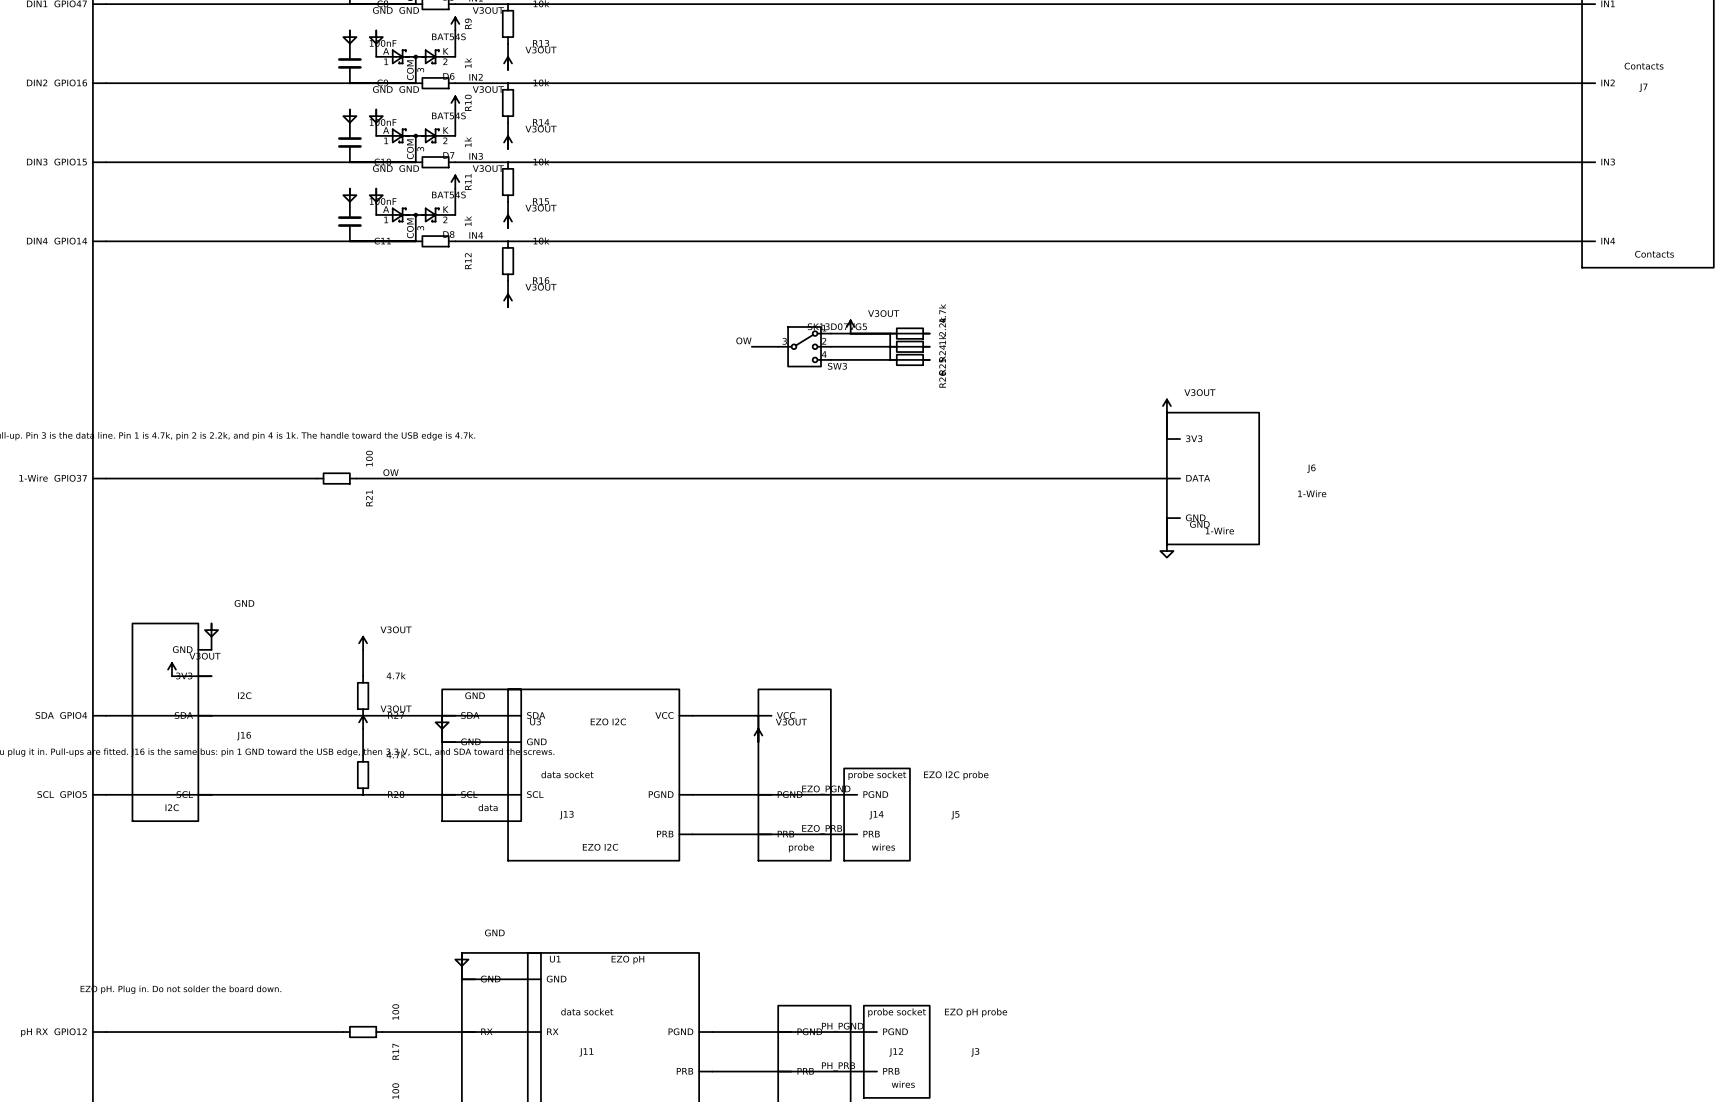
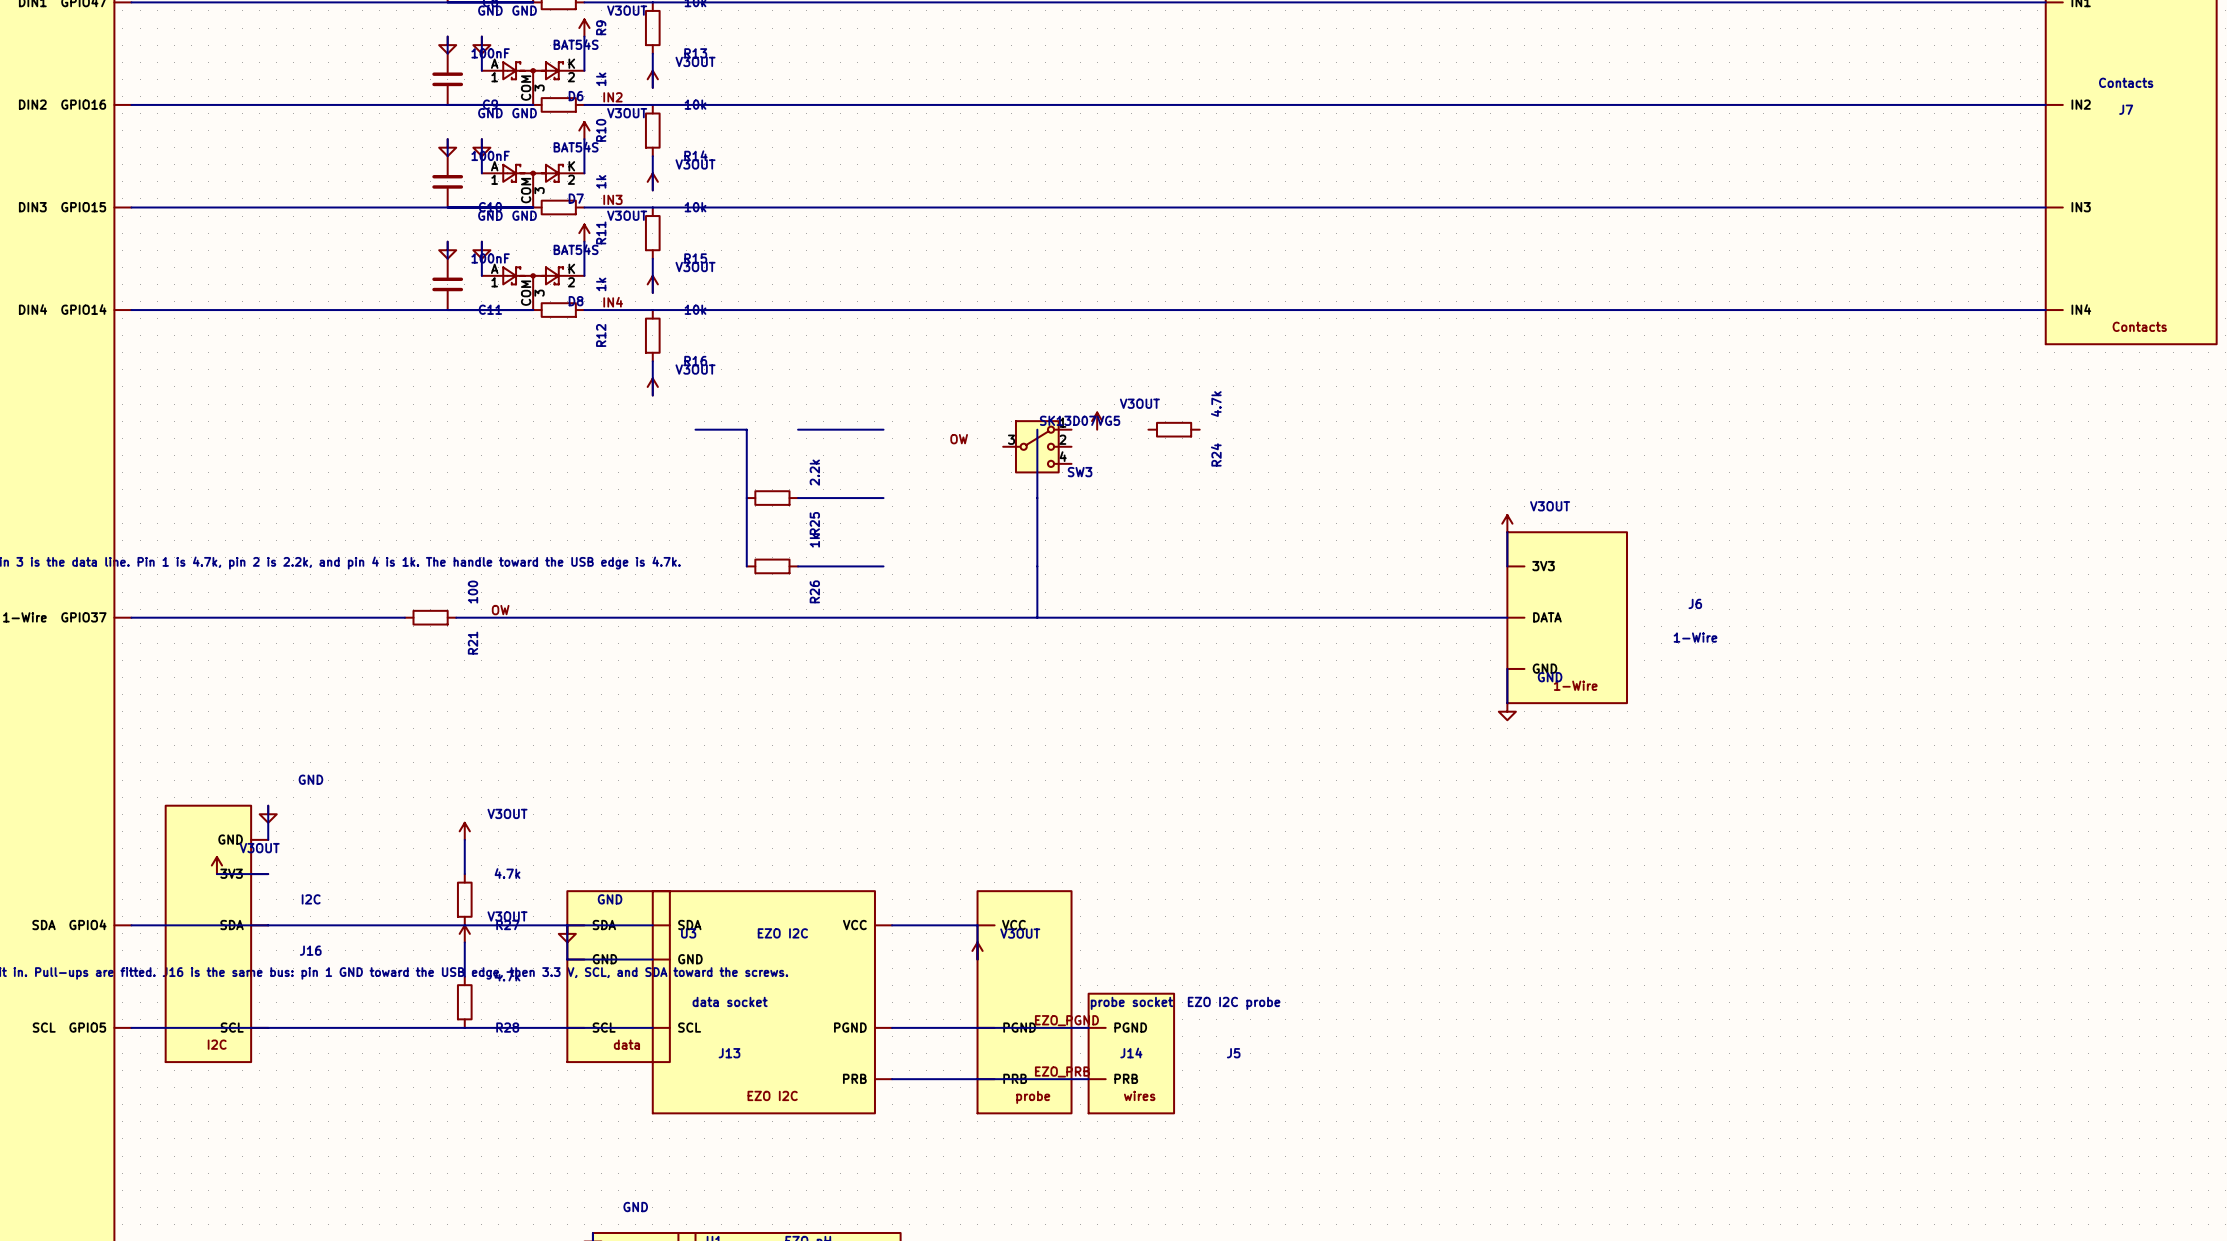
wire: none -> (695, 429) (746, 429) (746, 566)
wire: none -> (798, 429) (883, 429)
wire: none -> (1037, 429) (1037, 617)
wire: (830, 333) (929, 333) -> none
wire: (890, 333) (890, 359) -> none
wire: (751, 346) (778, 346) -> none
wire: (830, 346) (929, 346) -> none
R25 position: (909, 346) -> (772, 498)
wire: (830, 359) (929, 359) -> none
R26 position: (909, 359) -> (772, 566)
wire: none -> (798, 498) (883, 498)
wire: none -> (798, 566) (883, 566)

